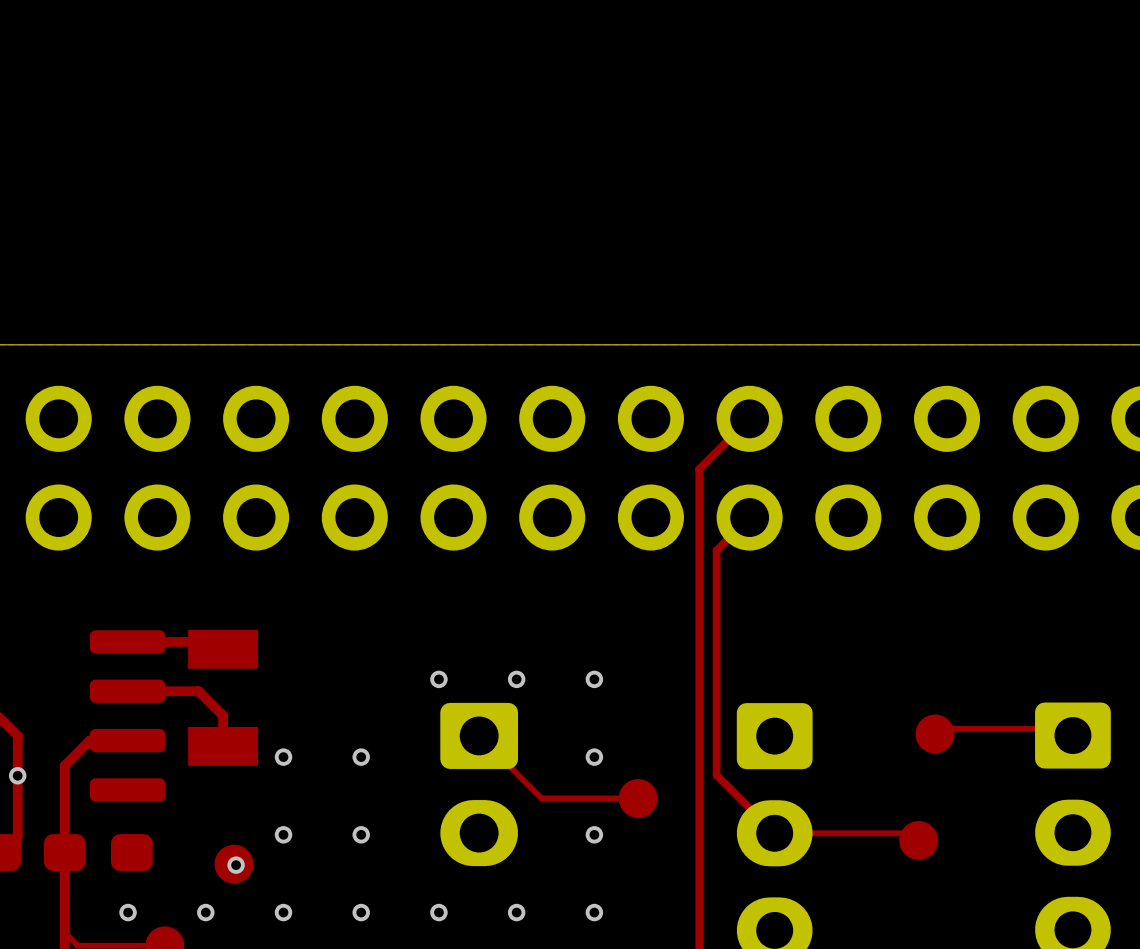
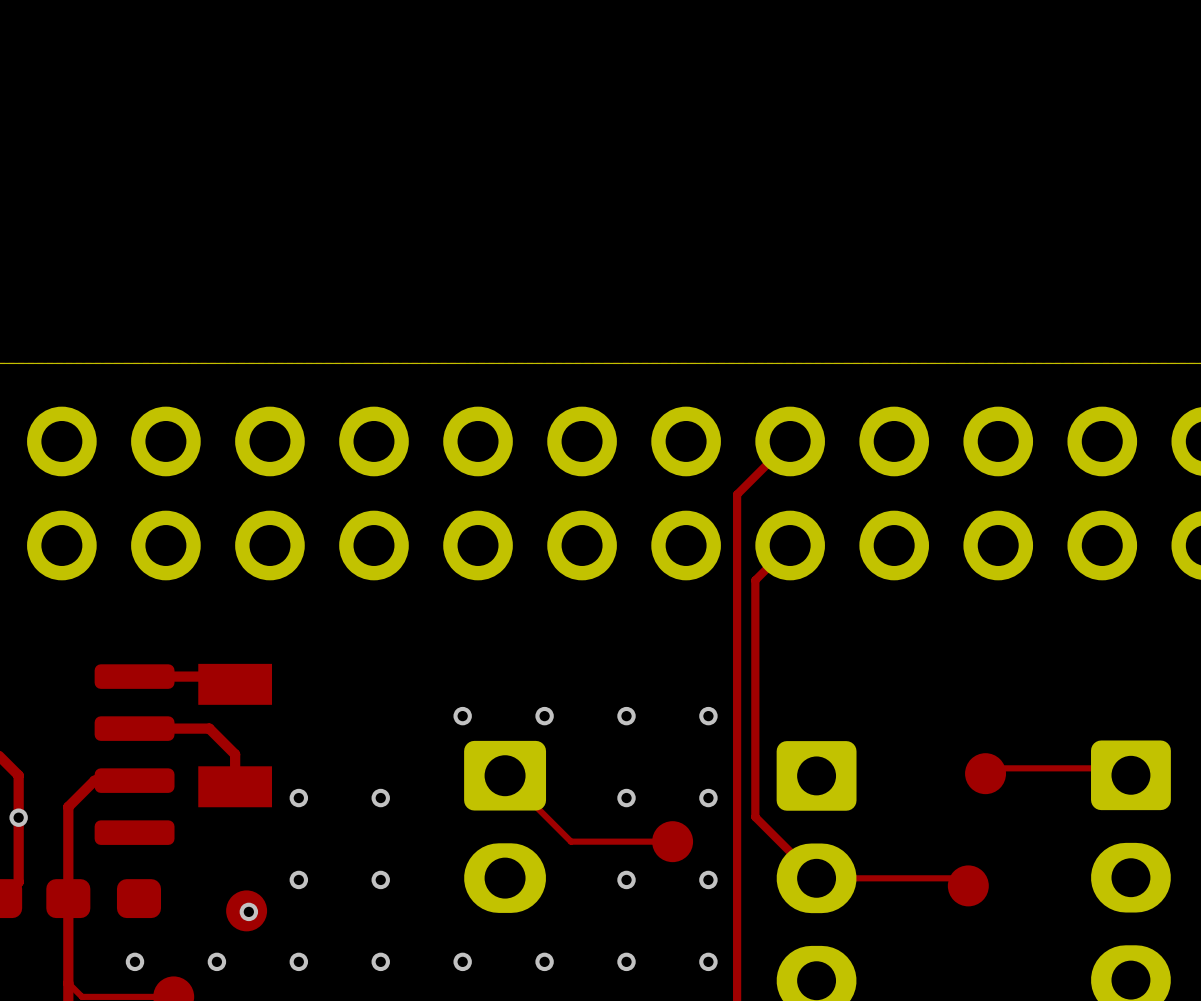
via: none -> (708, 716)
via: none -> (708, 798)
via: none -> (708, 879)
via: none -> (708, 961)

